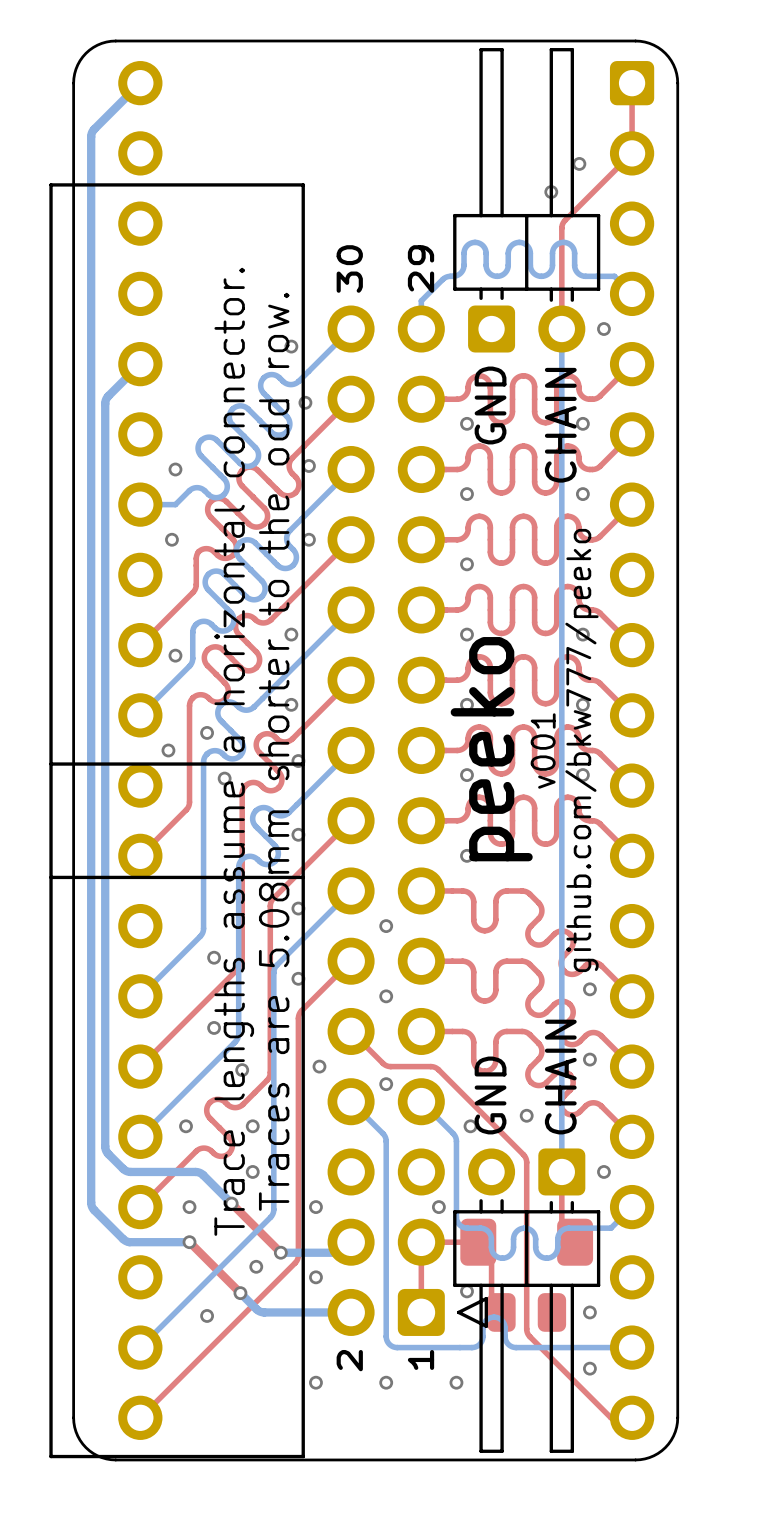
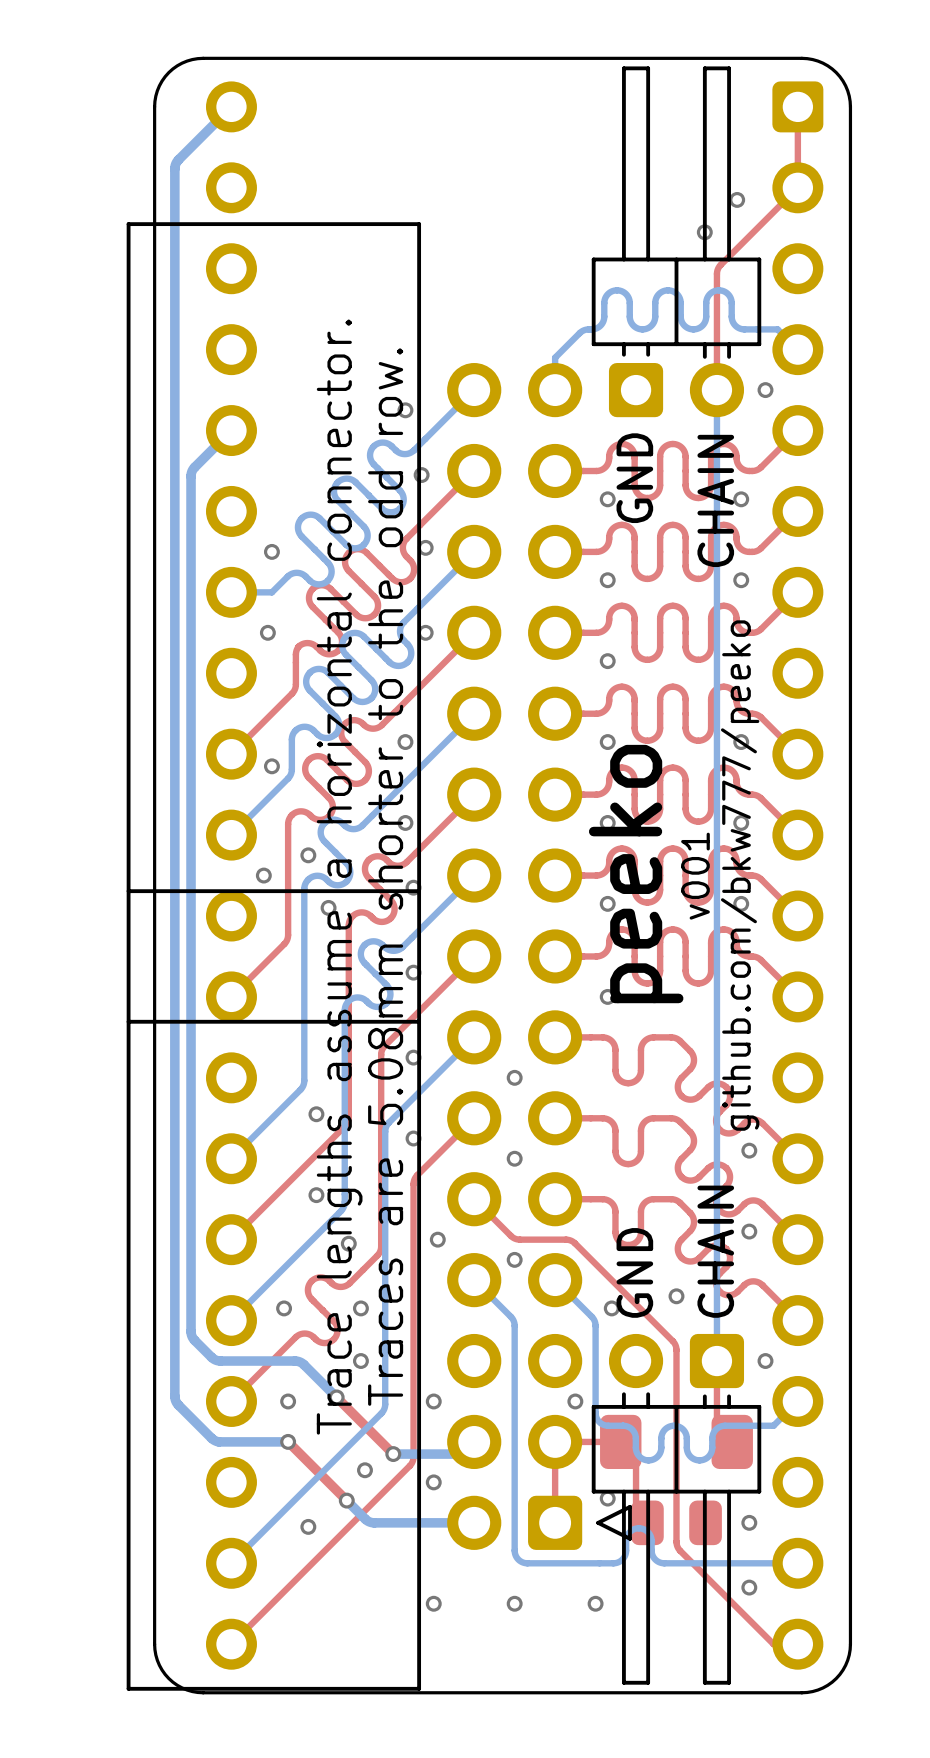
text: 30 (349, 268) -> none
text: 29 (421, 268) -> none
text: 1 (421, 1359) -> none
text: 2 (349, 1360) -> none

